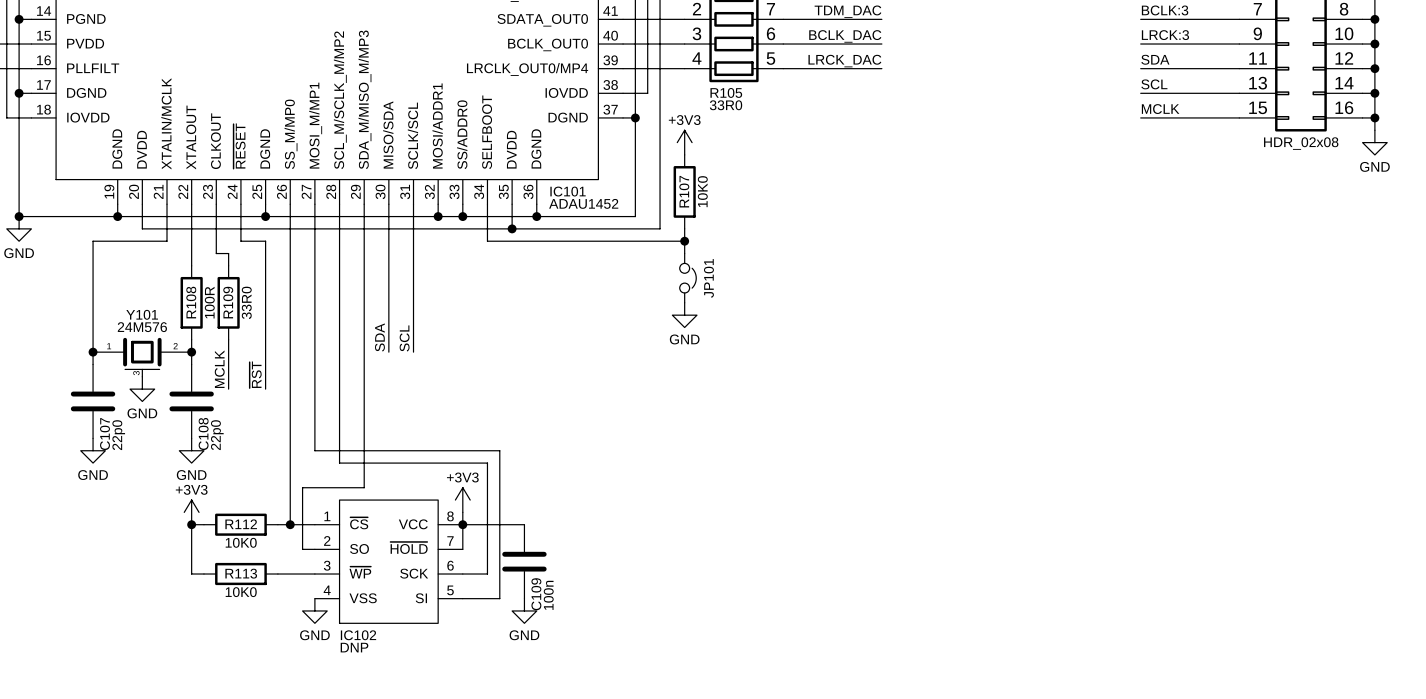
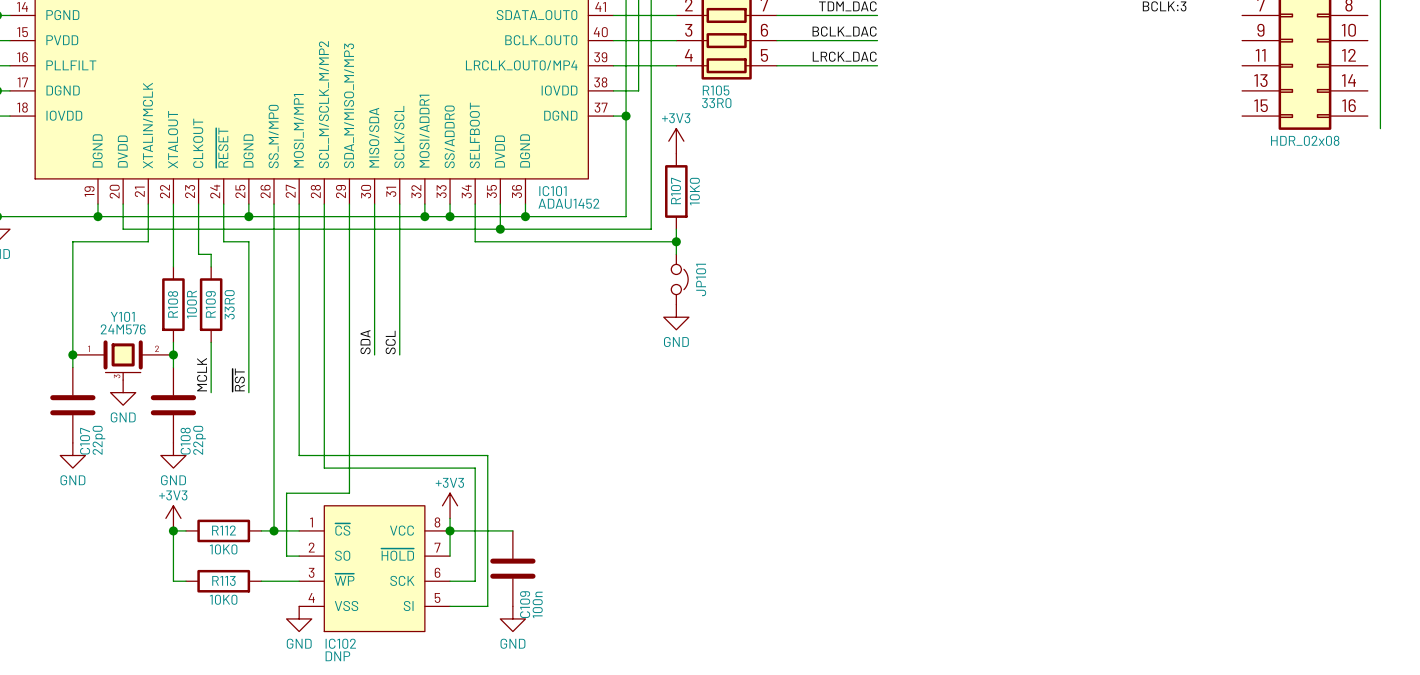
wire: (1140, 19) (1239, 19) -> none
wire: (1362, 19) (1374, 19) -> none
junction: (1374, 19) -> none
label: LRCK:3 (1165, 35) -> none
wire: (1140, 44) (1239, 44) -> none
wire: (1362, 44) (1374, 44) -> none
junction: (1374, 44) -> none
label: SDA (1155, 59) -> none
wire: (1140, 68) (1239, 68) -> none
wire: (1362, 68) (1374, 68) -> none
junction: (1374, 68) -> none
label: SCL (1154, 84) -> none
wire: (1140, 93) (1239, 93) -> none
wire: (1362, 93) (1374, 93) -> none
junction: (1374, 93) -> none
label: MCLK (1160, 109) -> none
wire: (1140, 117) (1239, 117) -> none
wire: (1362, 117) (1374, 117) -> none
junction: (1374, 117) -> none
power symbol: GND (1374, 142) -> none

